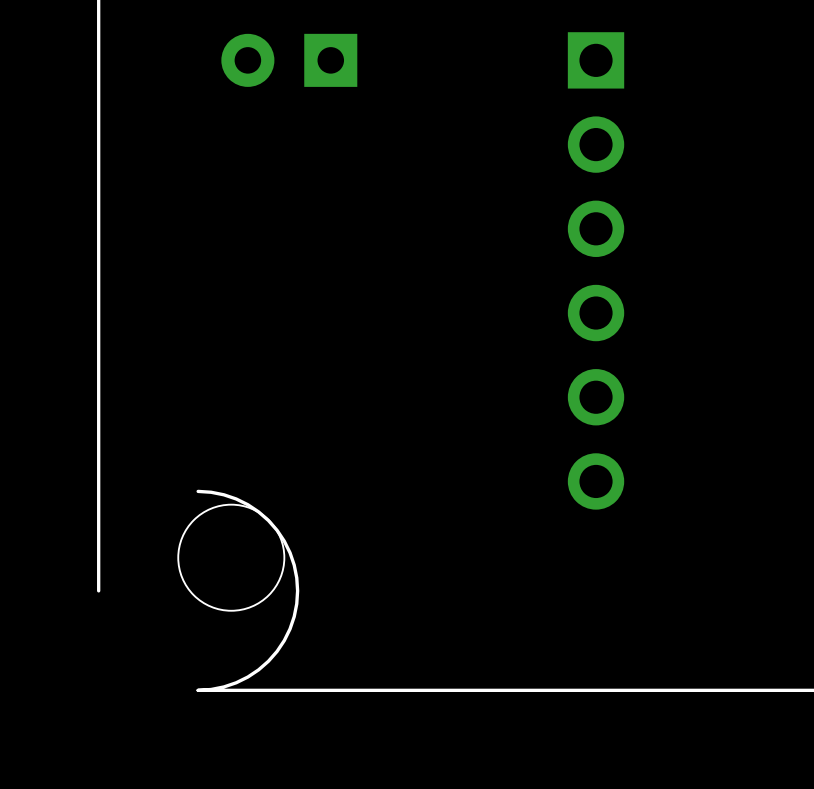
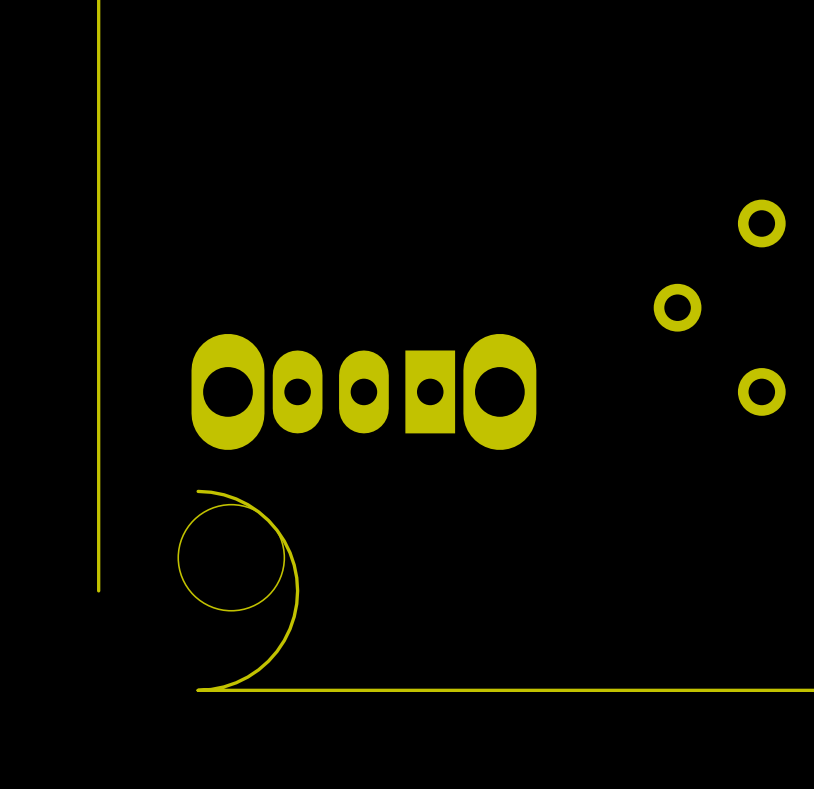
part: (289, 60) -> none
part: (596, 270) -> none
part: none -> (719, 307)
part: none -> (363, 391)

